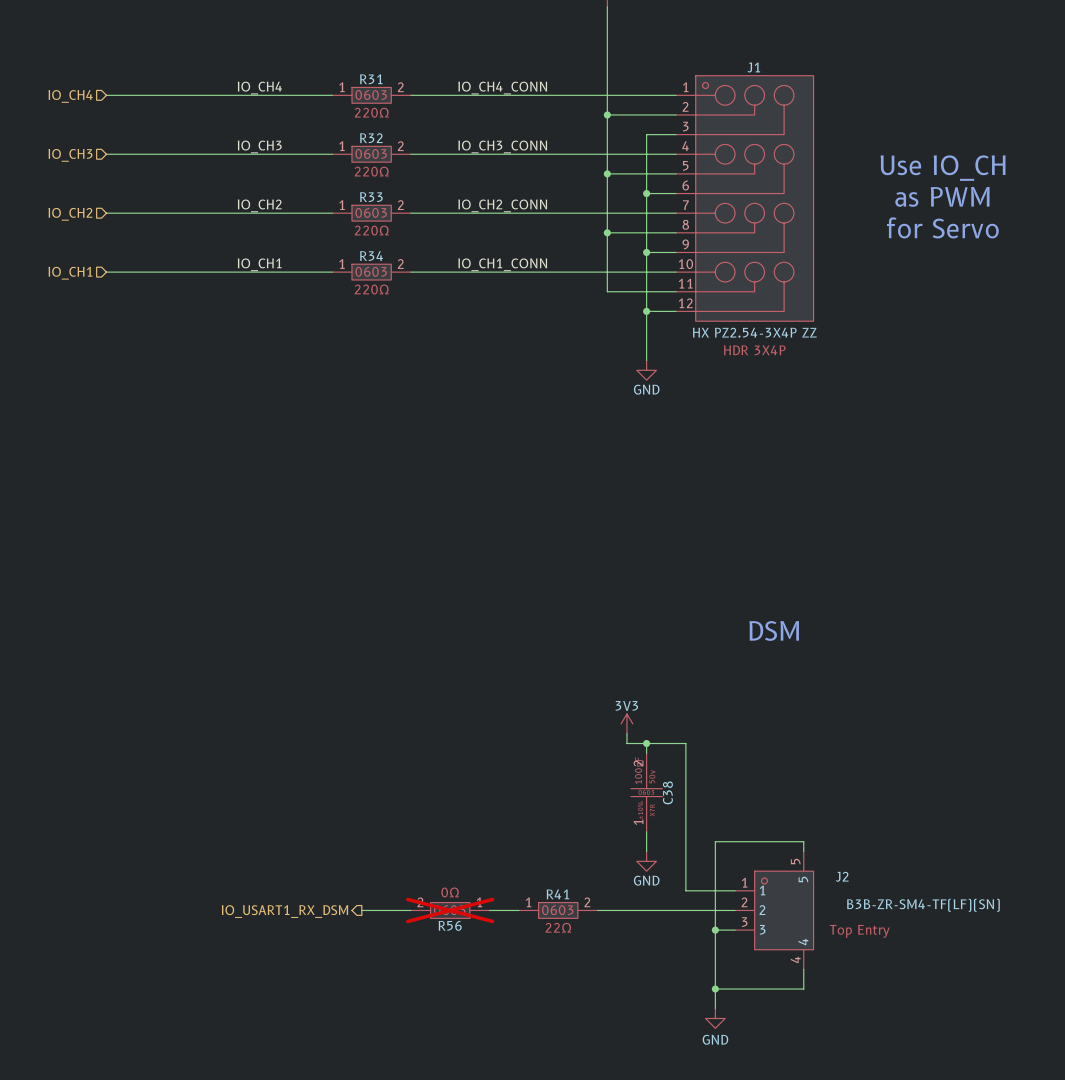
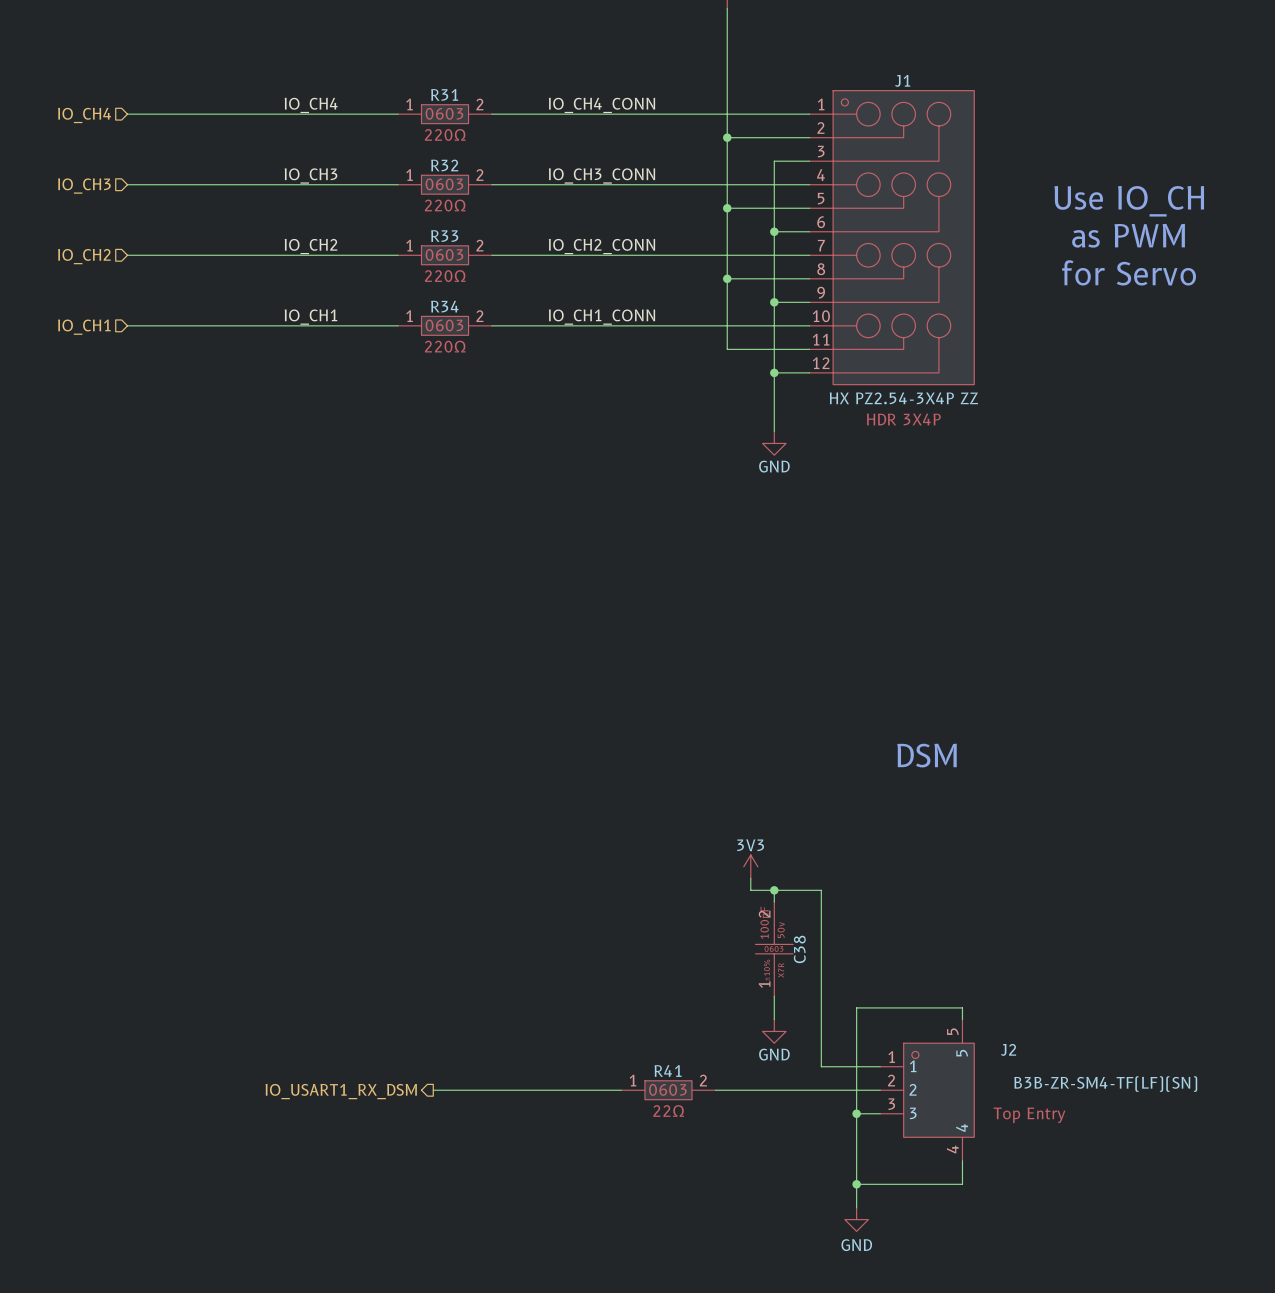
R56: (450, 910) -> none

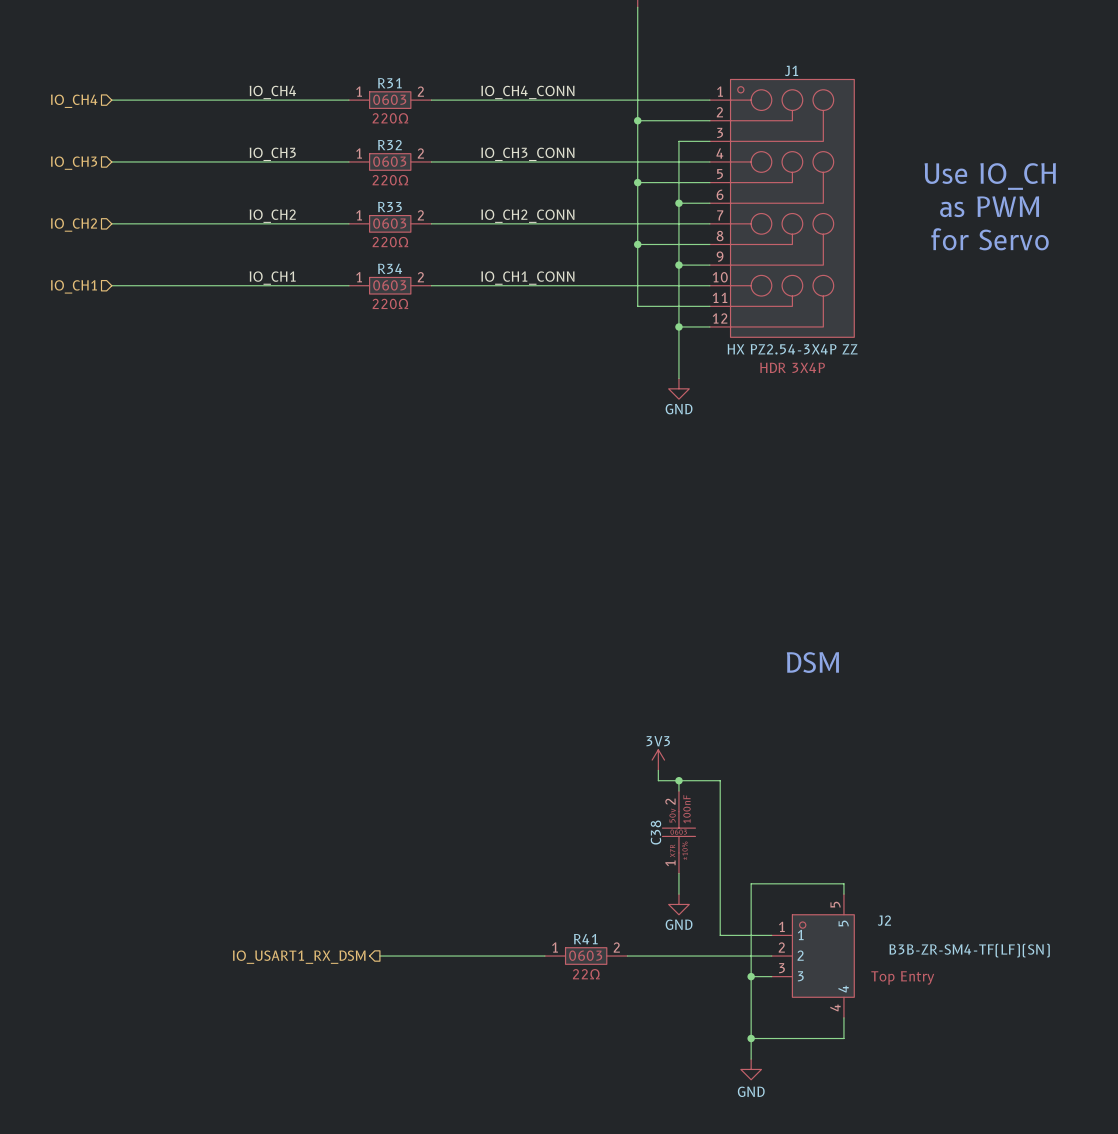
C38 flip: as is (774, 949) -> left-right (678, 832)

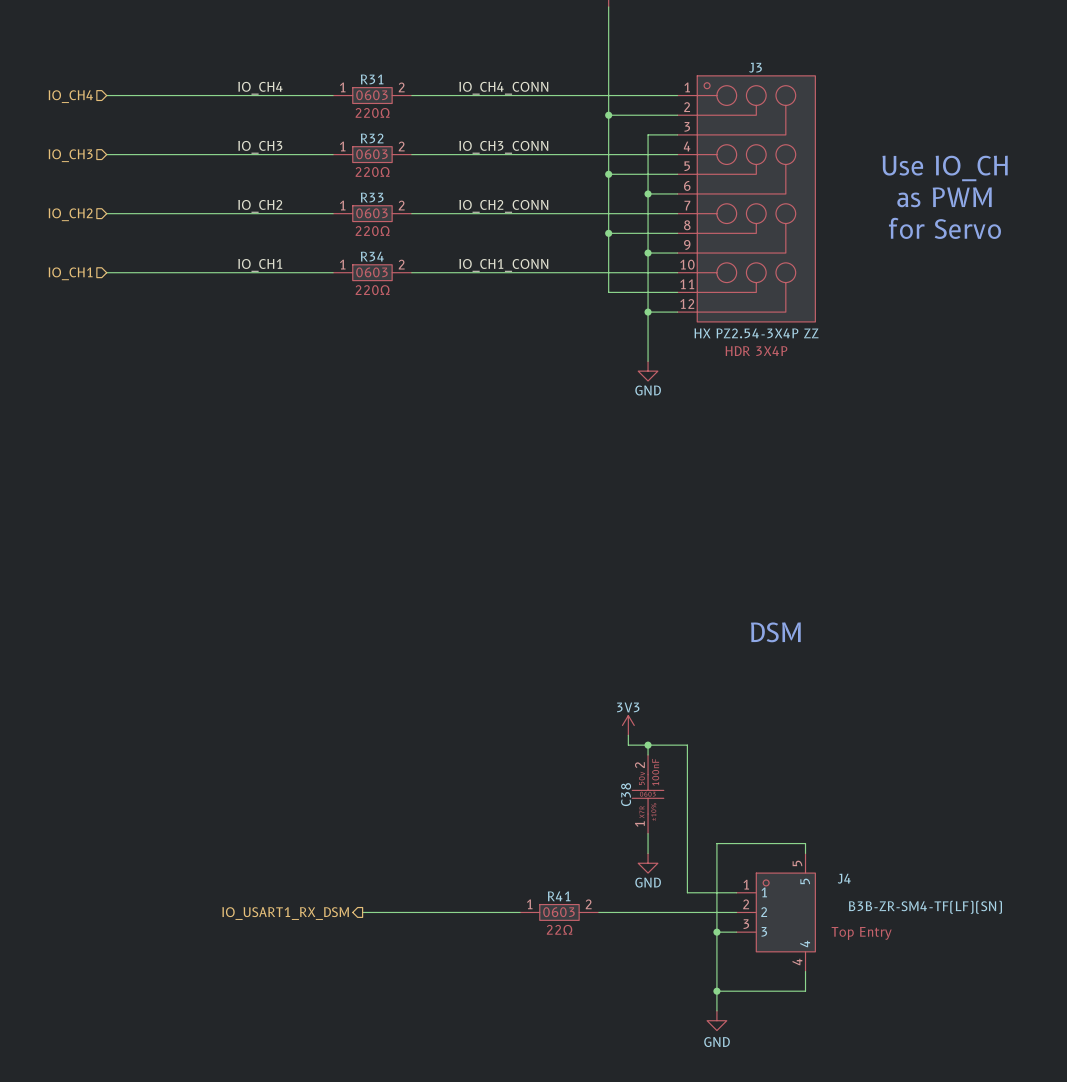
J1 name: J1 (791, 70) -> J3 (755, 67)
J2 name: J2 (884, 920) -> J4 (844, 878)

